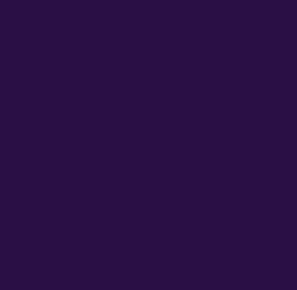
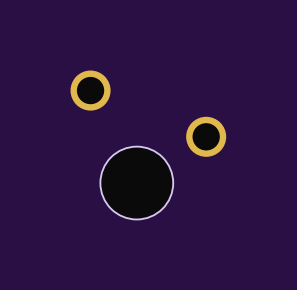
part: none -> (148, 145)

